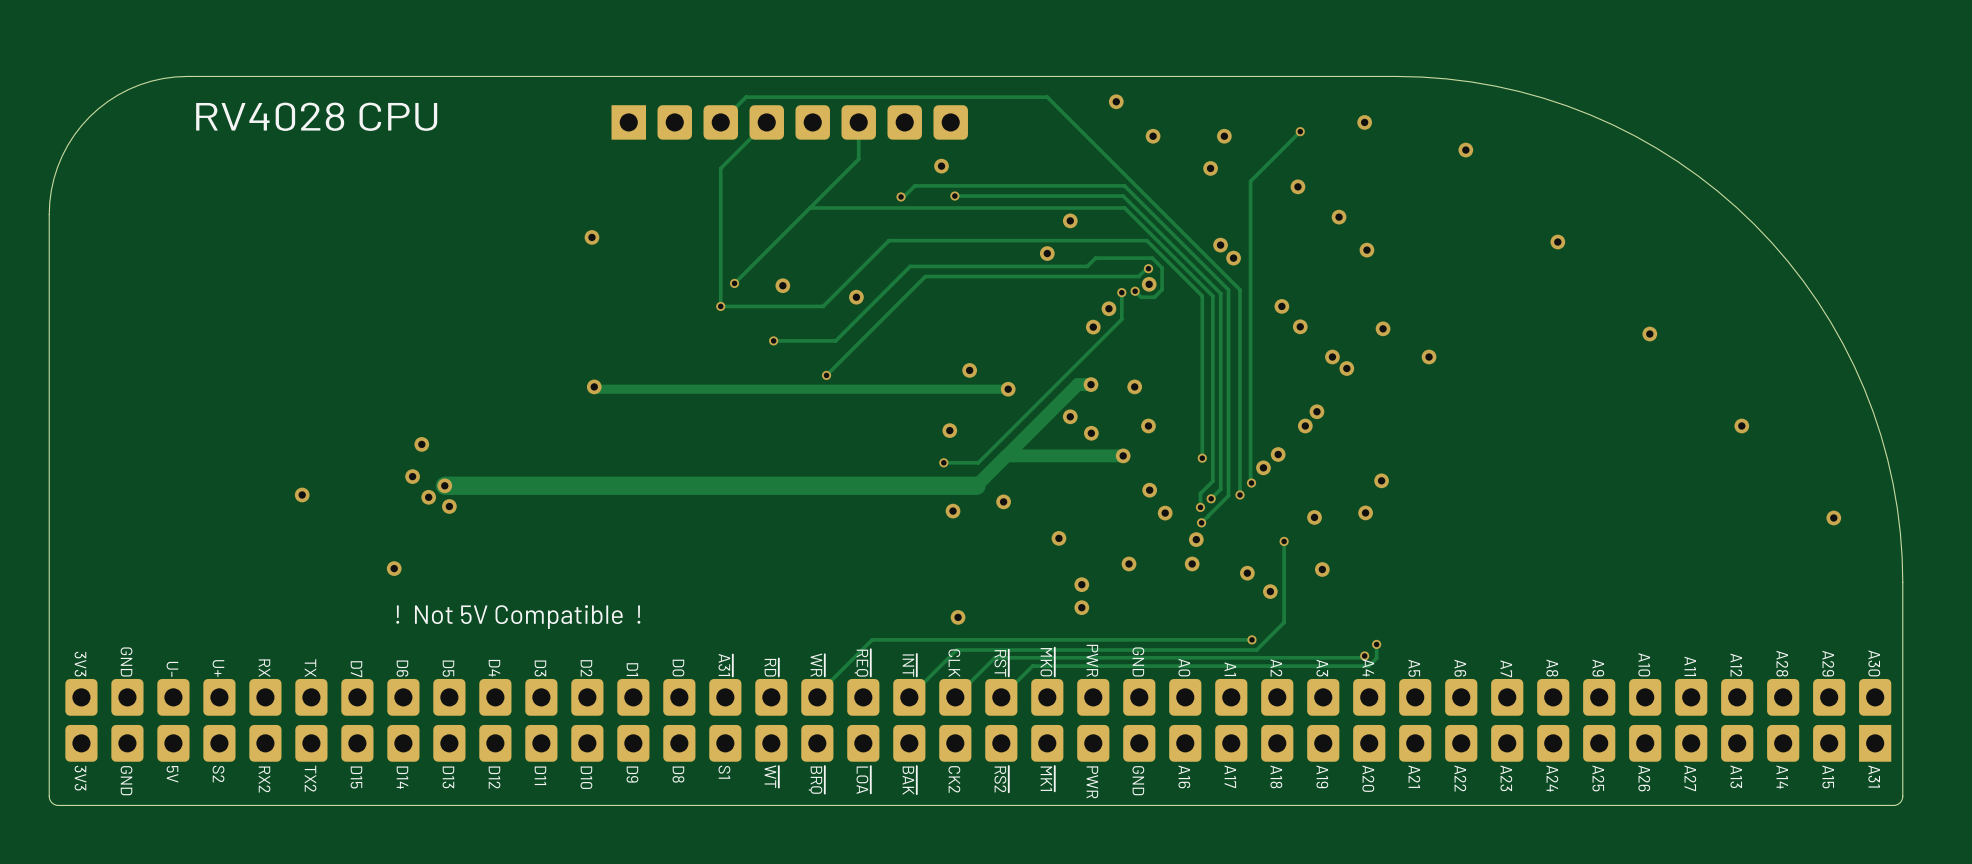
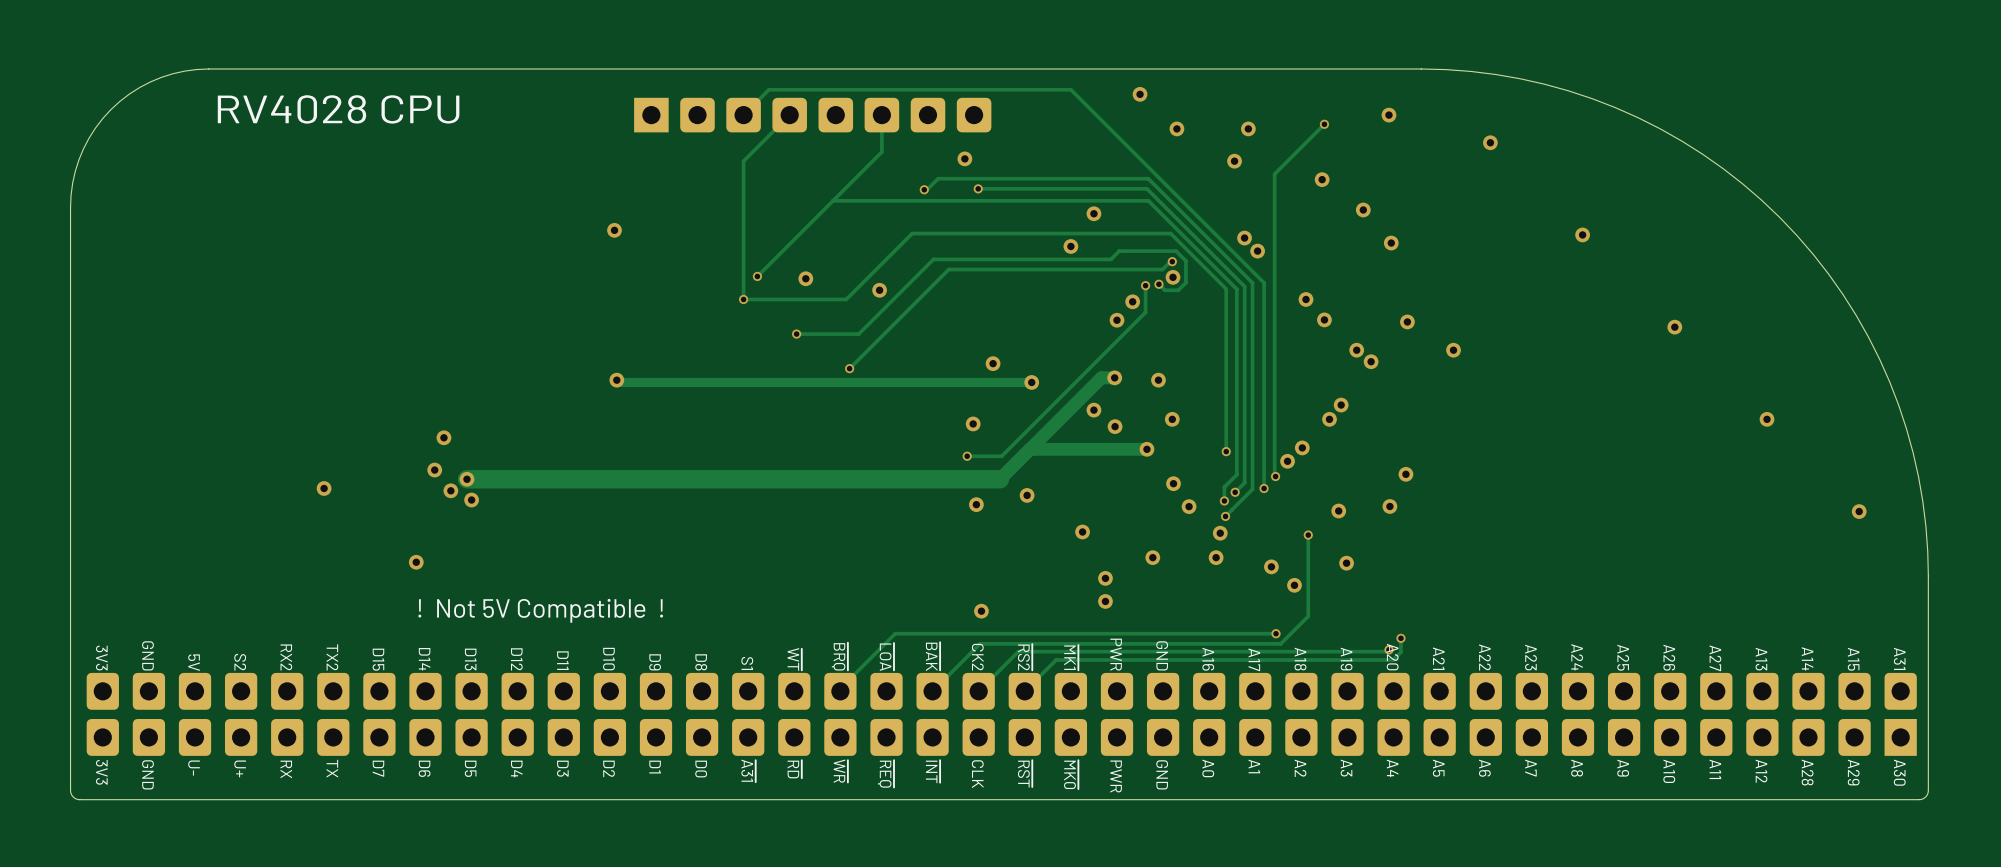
part footprint: [65, 678, 1892, 762] -> [86, 672, 1917, 756]

